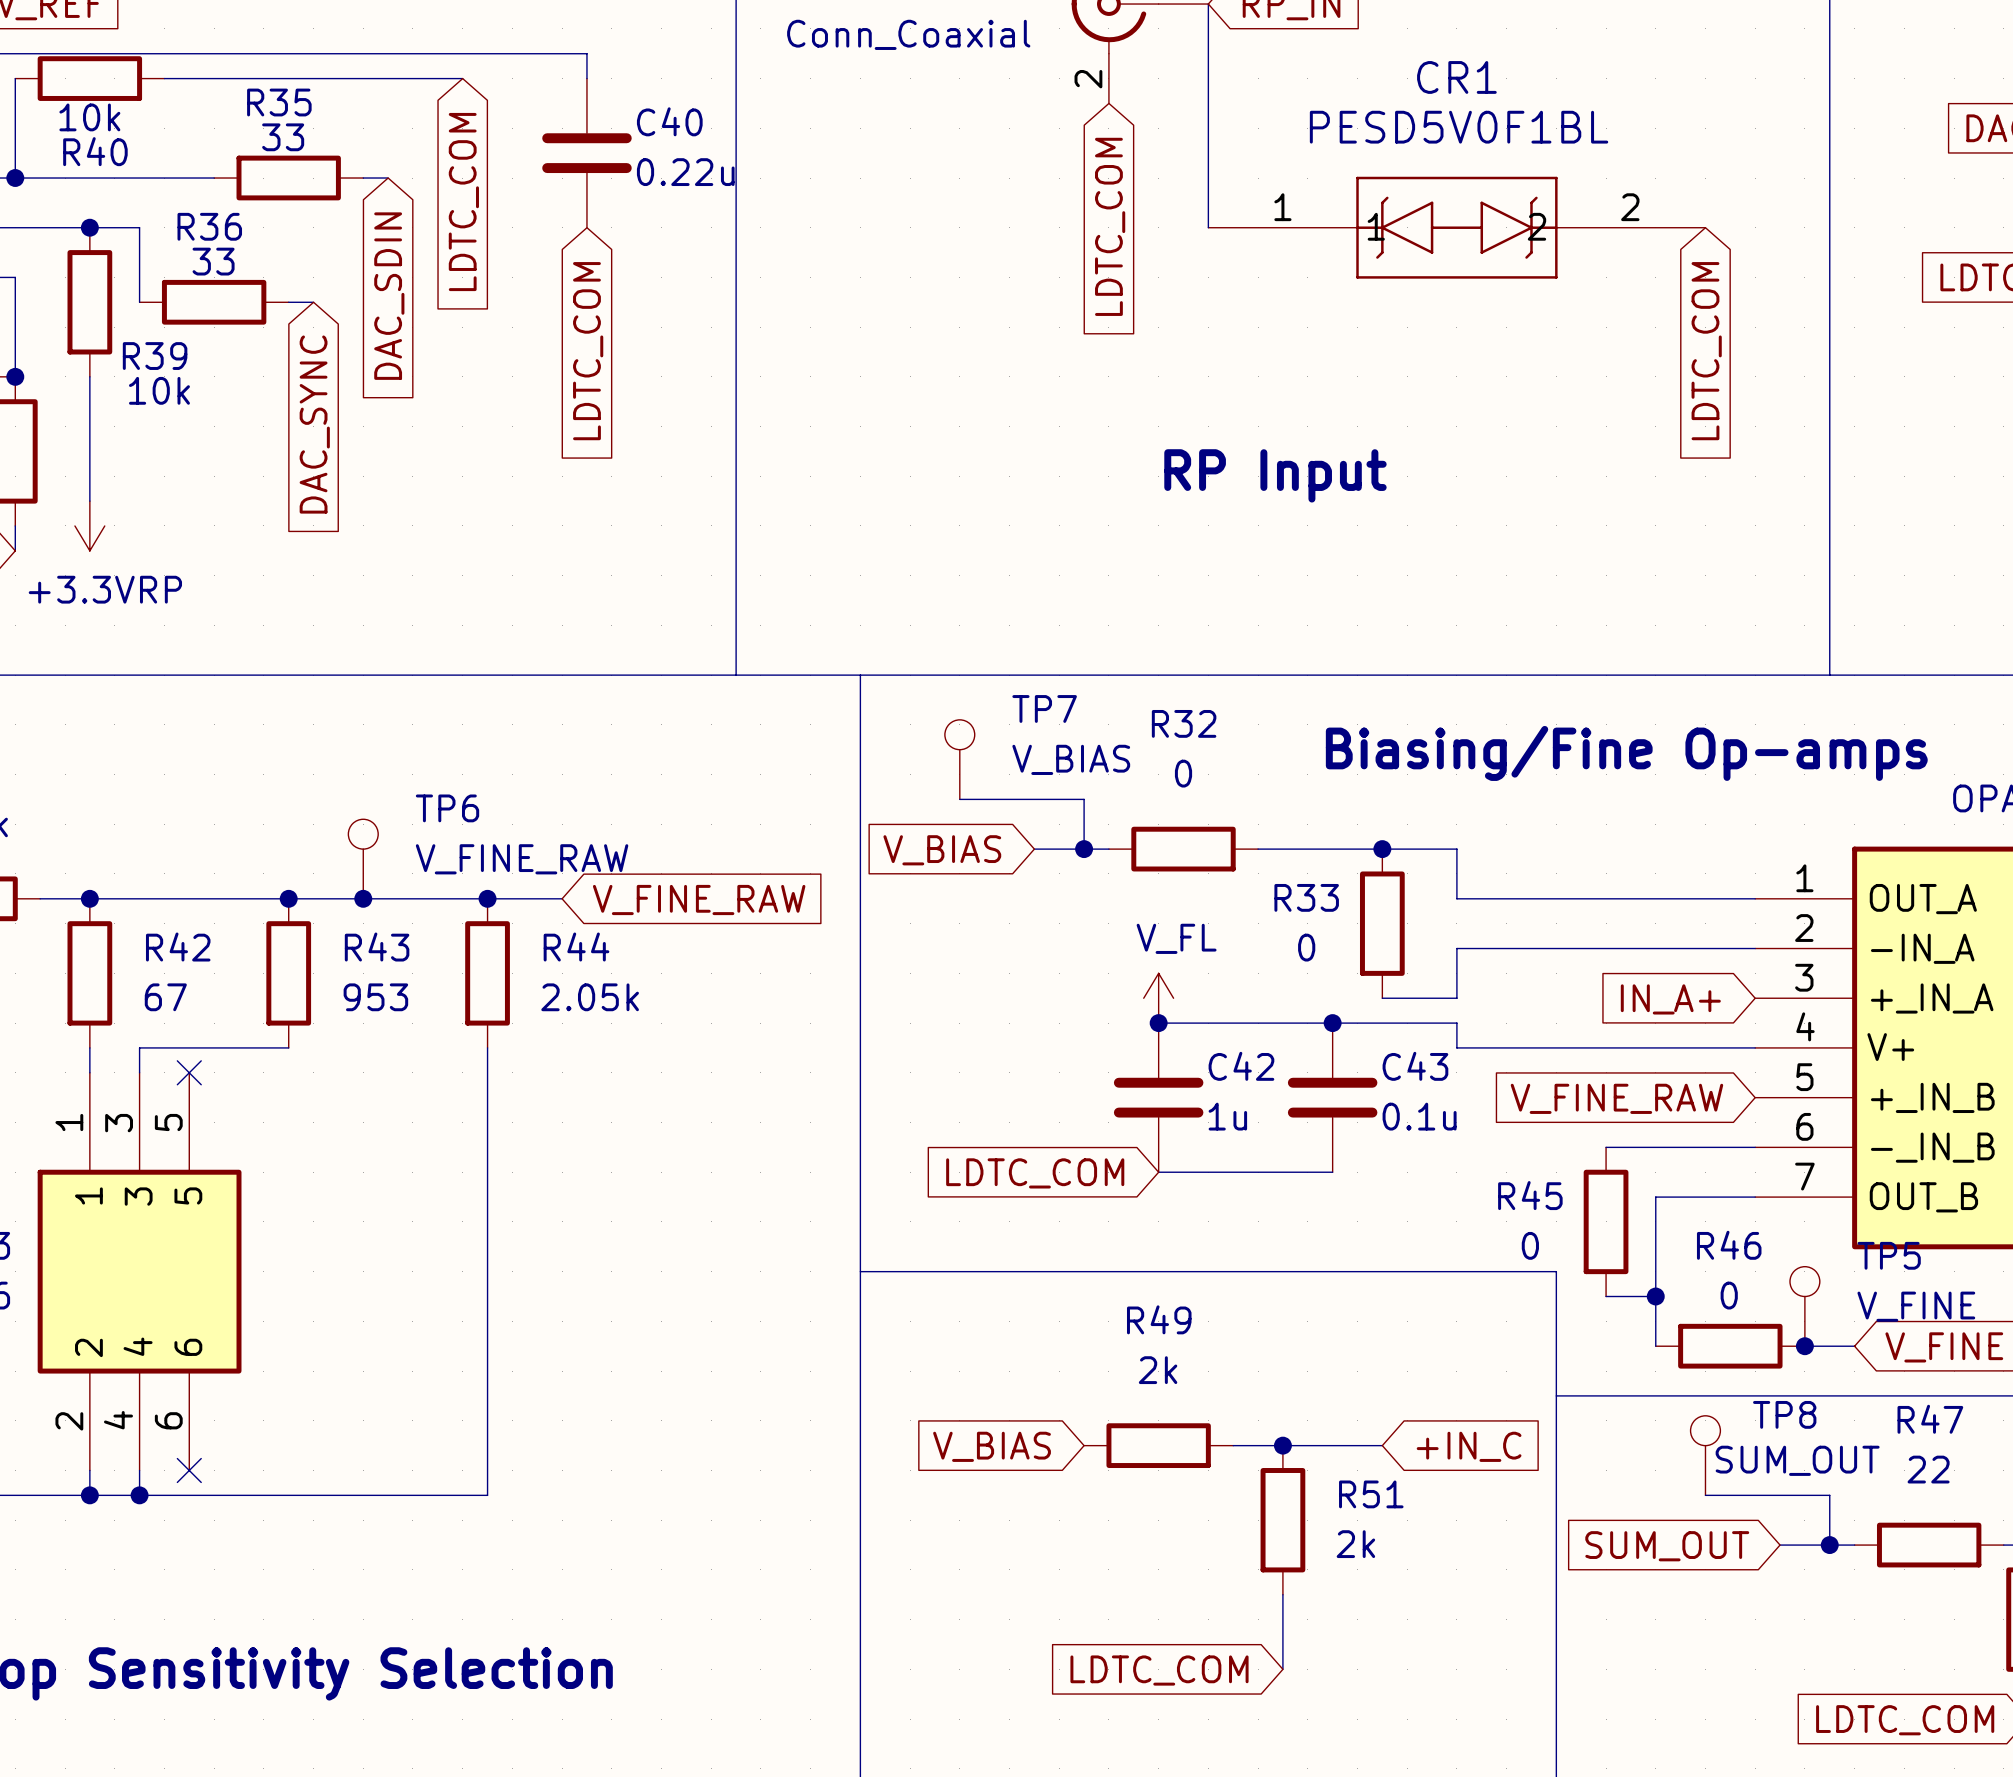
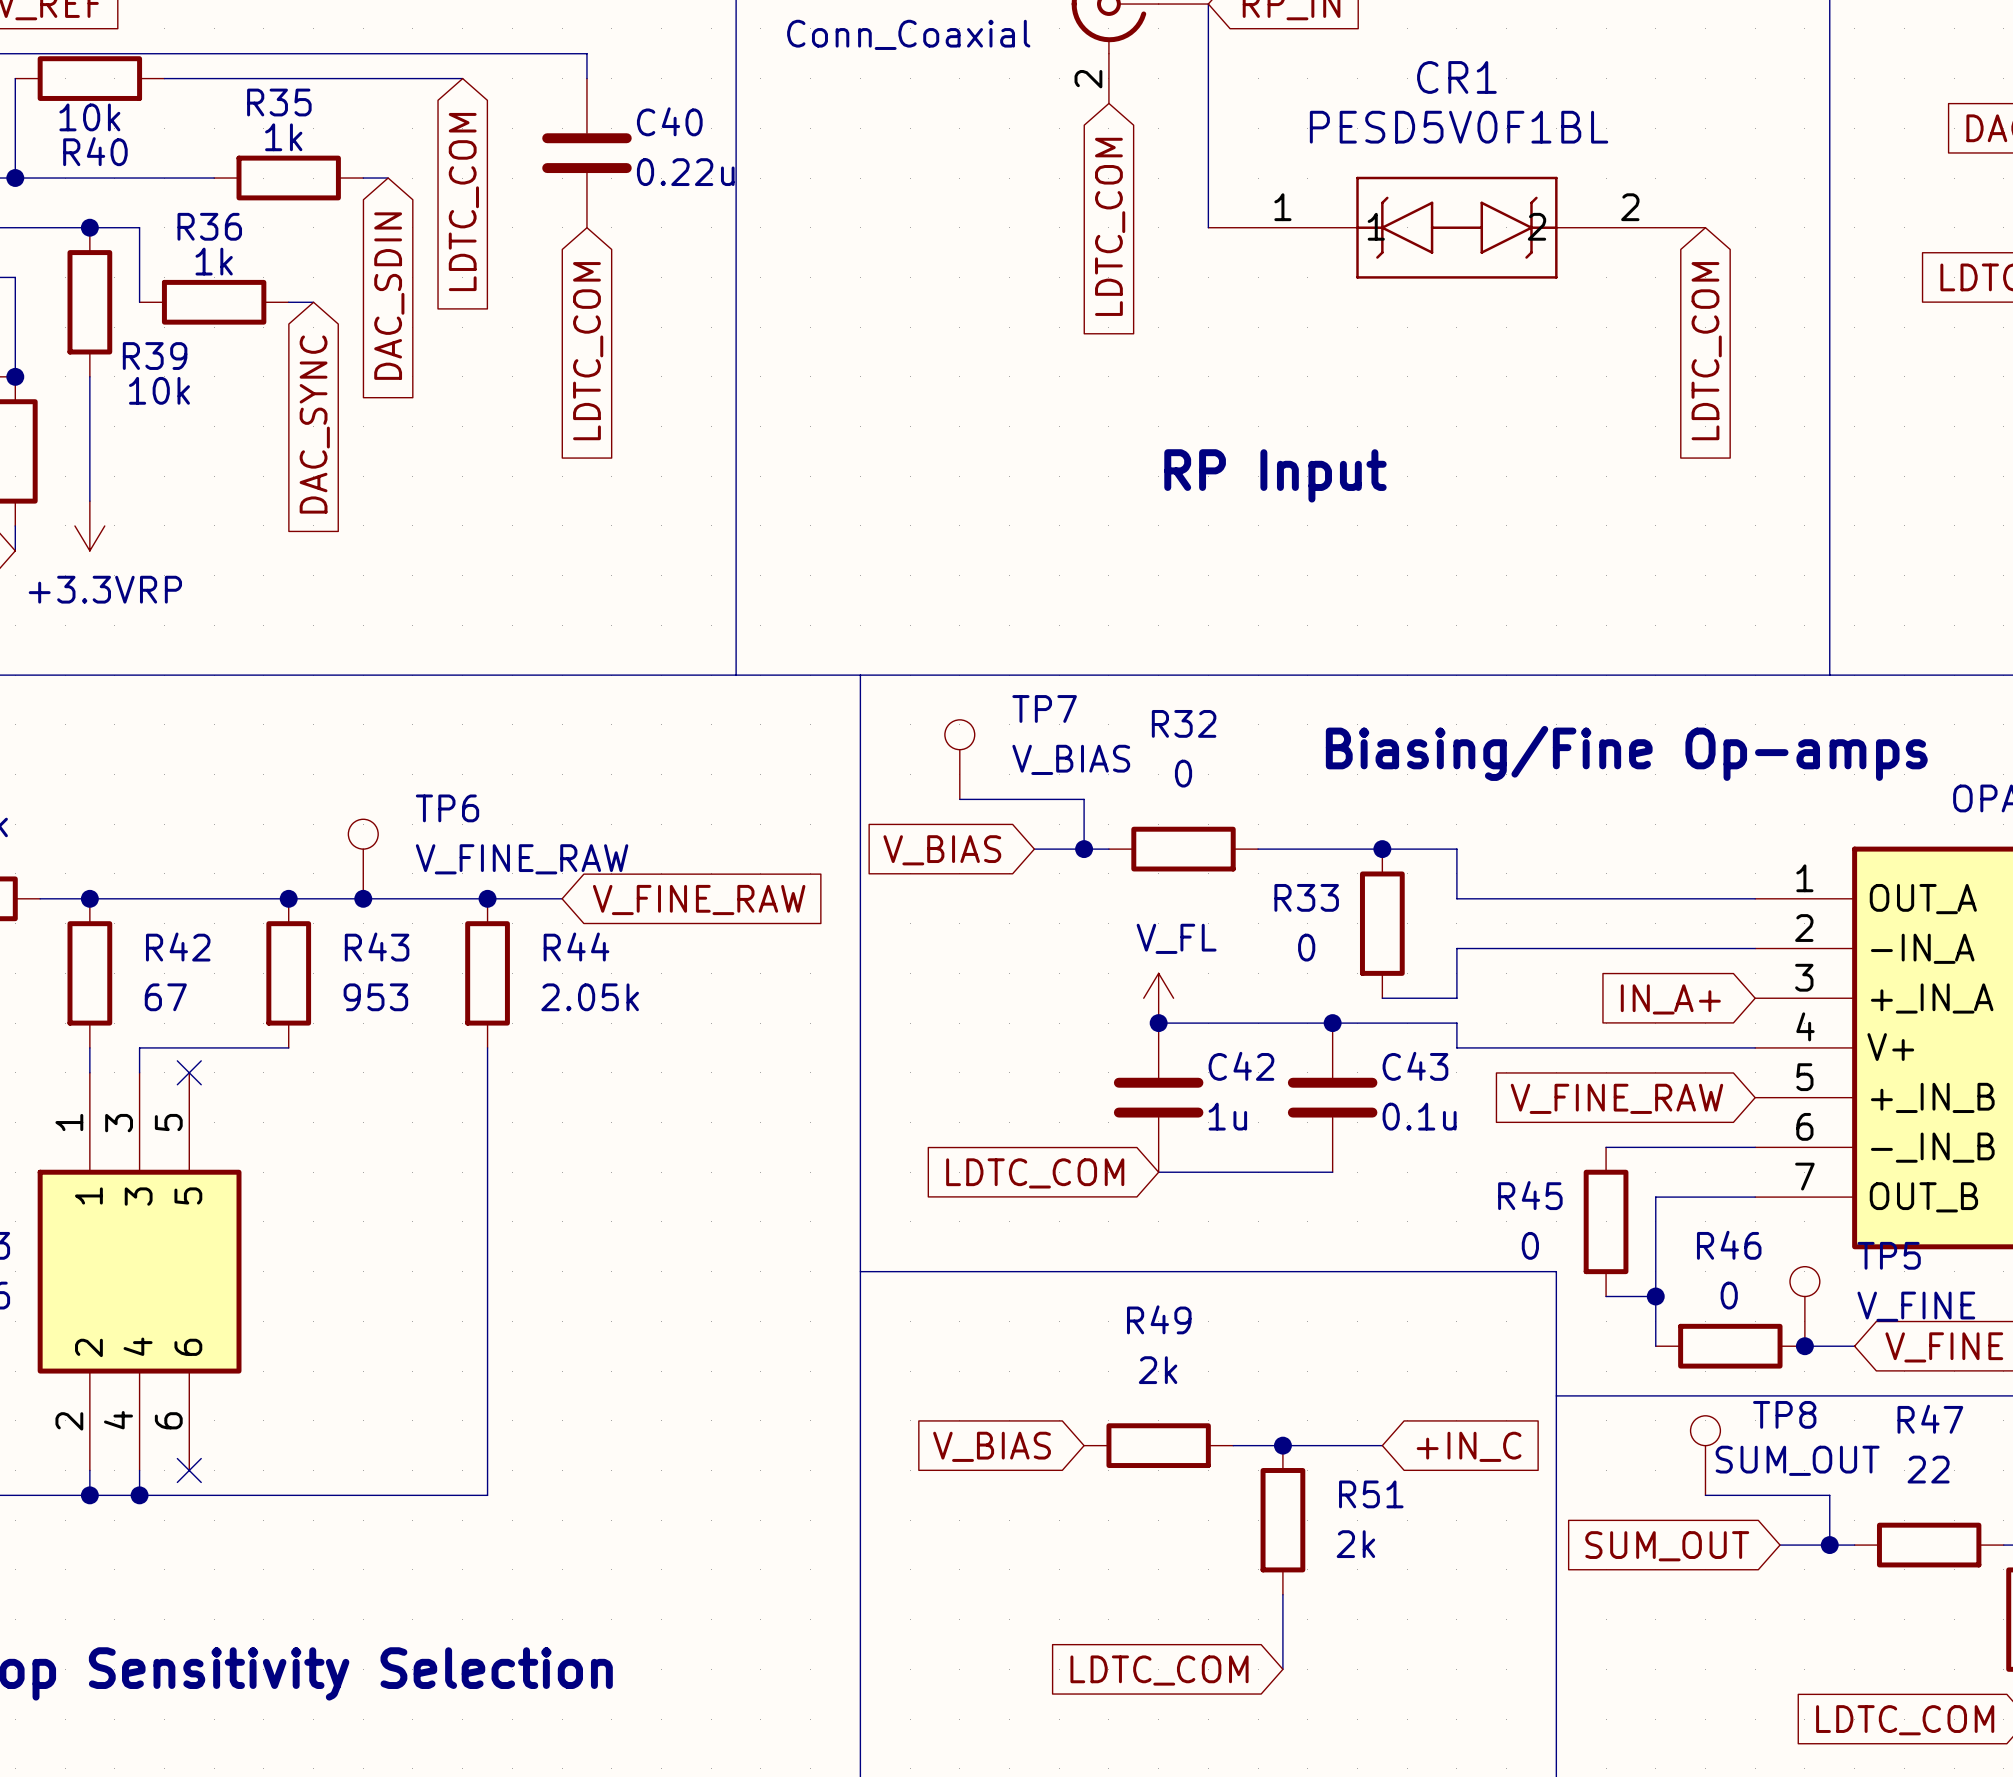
R35 value: 33 (283, 137) -> 1k (283, 137)
R36 value: 33 (213, 261) -> 1k (214, 261)

